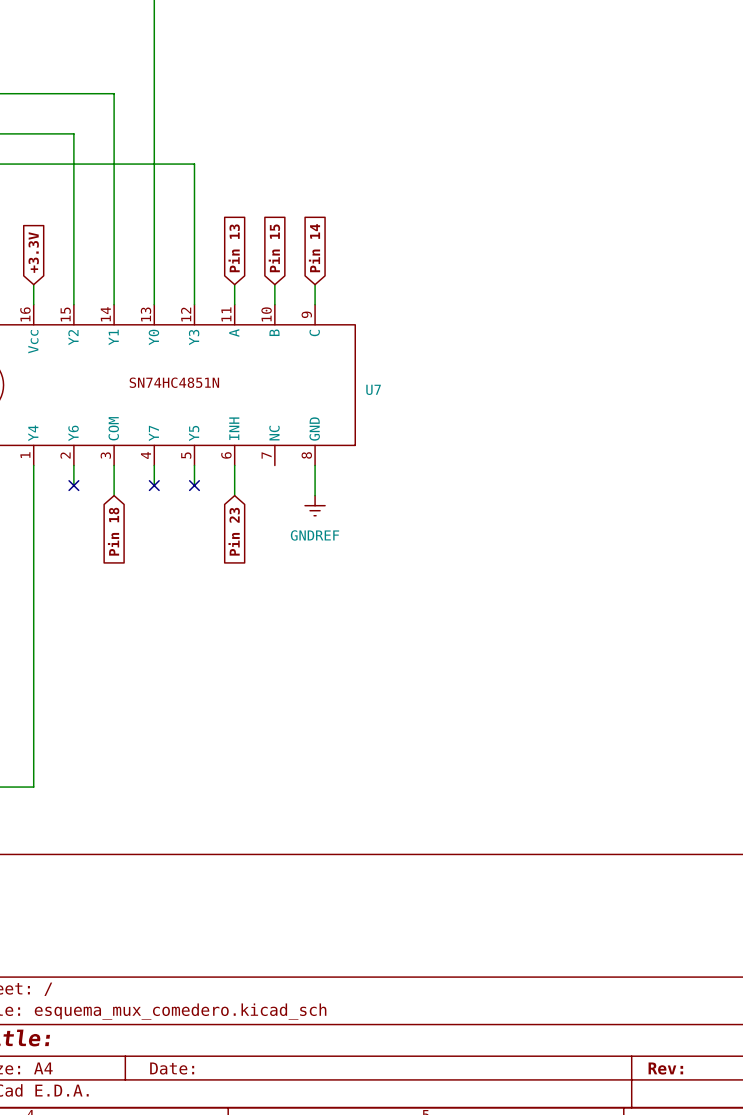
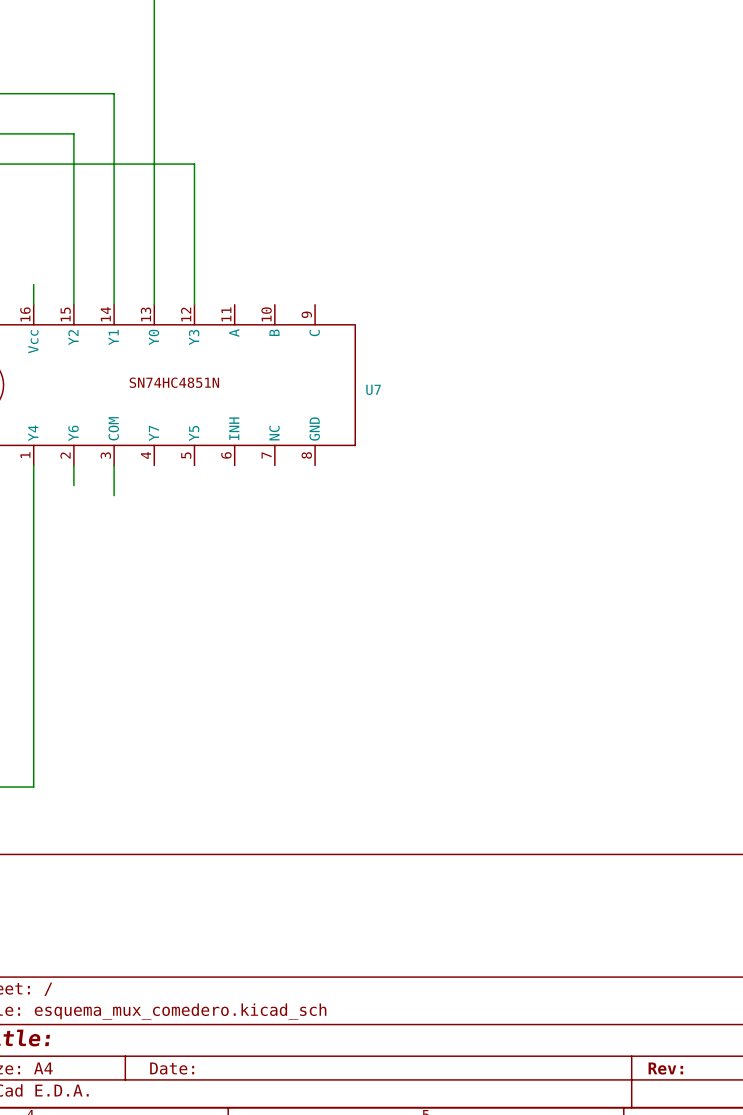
global label: Pin 13 (234, 248) -> none
global label: Pin 15 (274, 248) -> none
global label: Pin 14 (314, 248) -> none
global label: +3.3V (33, 252) -> none
wire: (234, 284) (234, 304) -> none
wire: (274, 284) (274, 304) -> none
wire: (315, 284) (315, 304) -> none
wire: (154, 465) (154, 485) -> none
wire: (194, 465) (194, 485) -> none
wire: (234, 465) (234, 495) -> none
wire: (315, 465) (315, 495) -> none
no-connect mark: (73, 485) -> none
no-connect mark: (154, 485) -> none
no-connect mark: (194, 485) -> none
power symbol: GNDREF (315, 505) -> none
global label: Pin 18 (113, 531) -> none
global label: Pin 23 (234, 531) -> none

